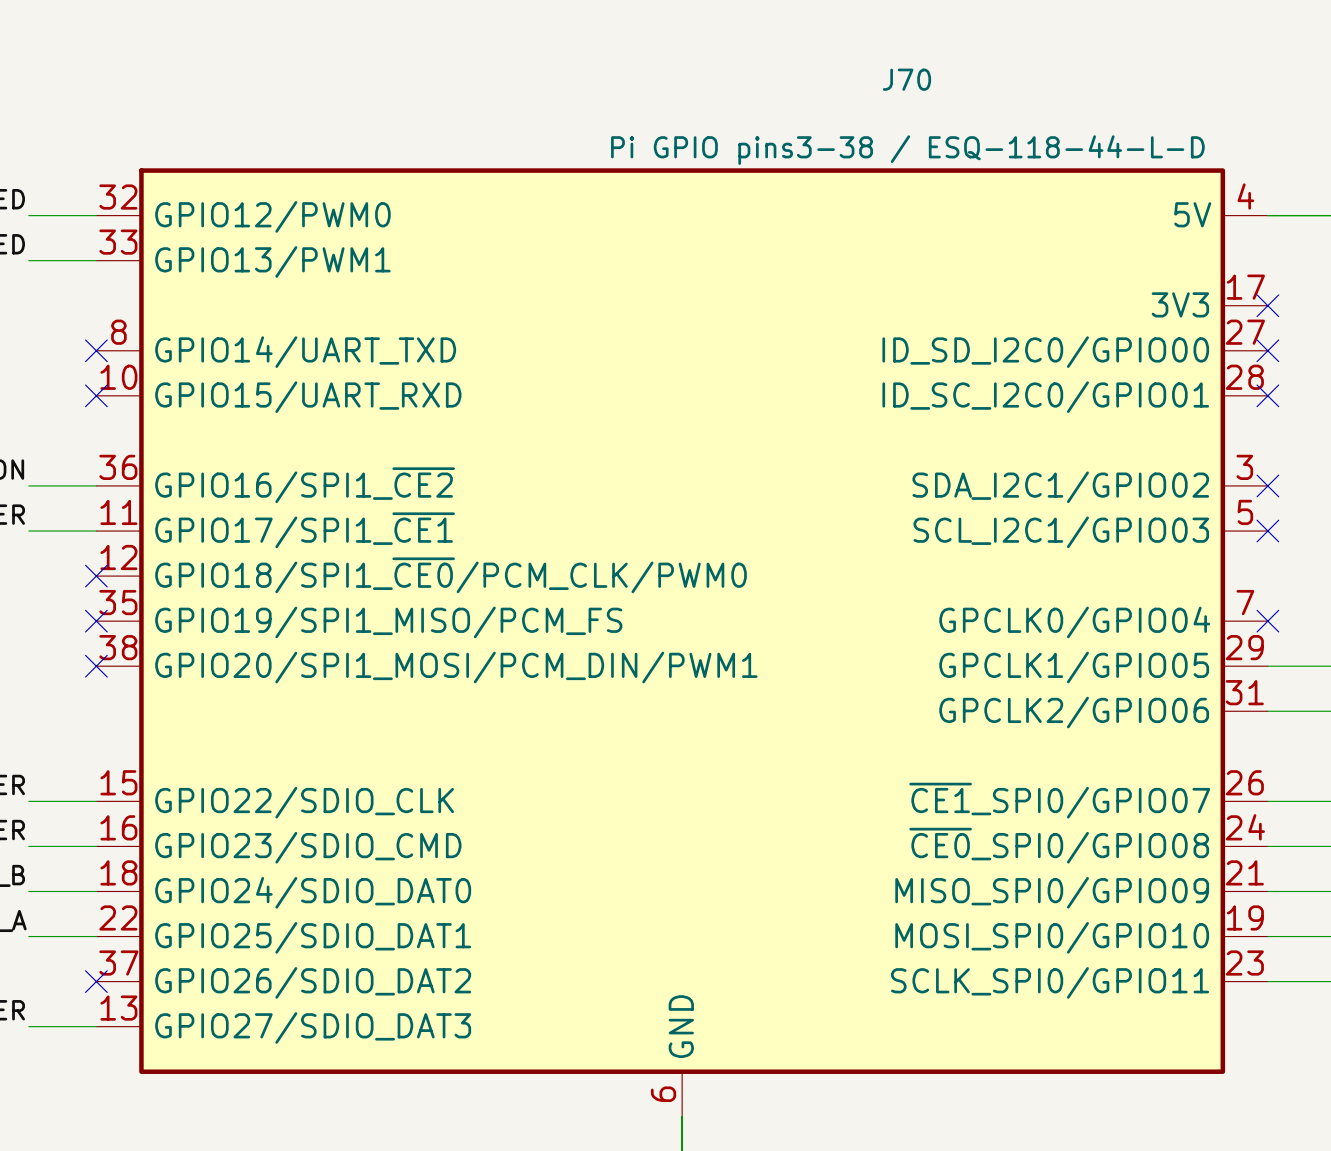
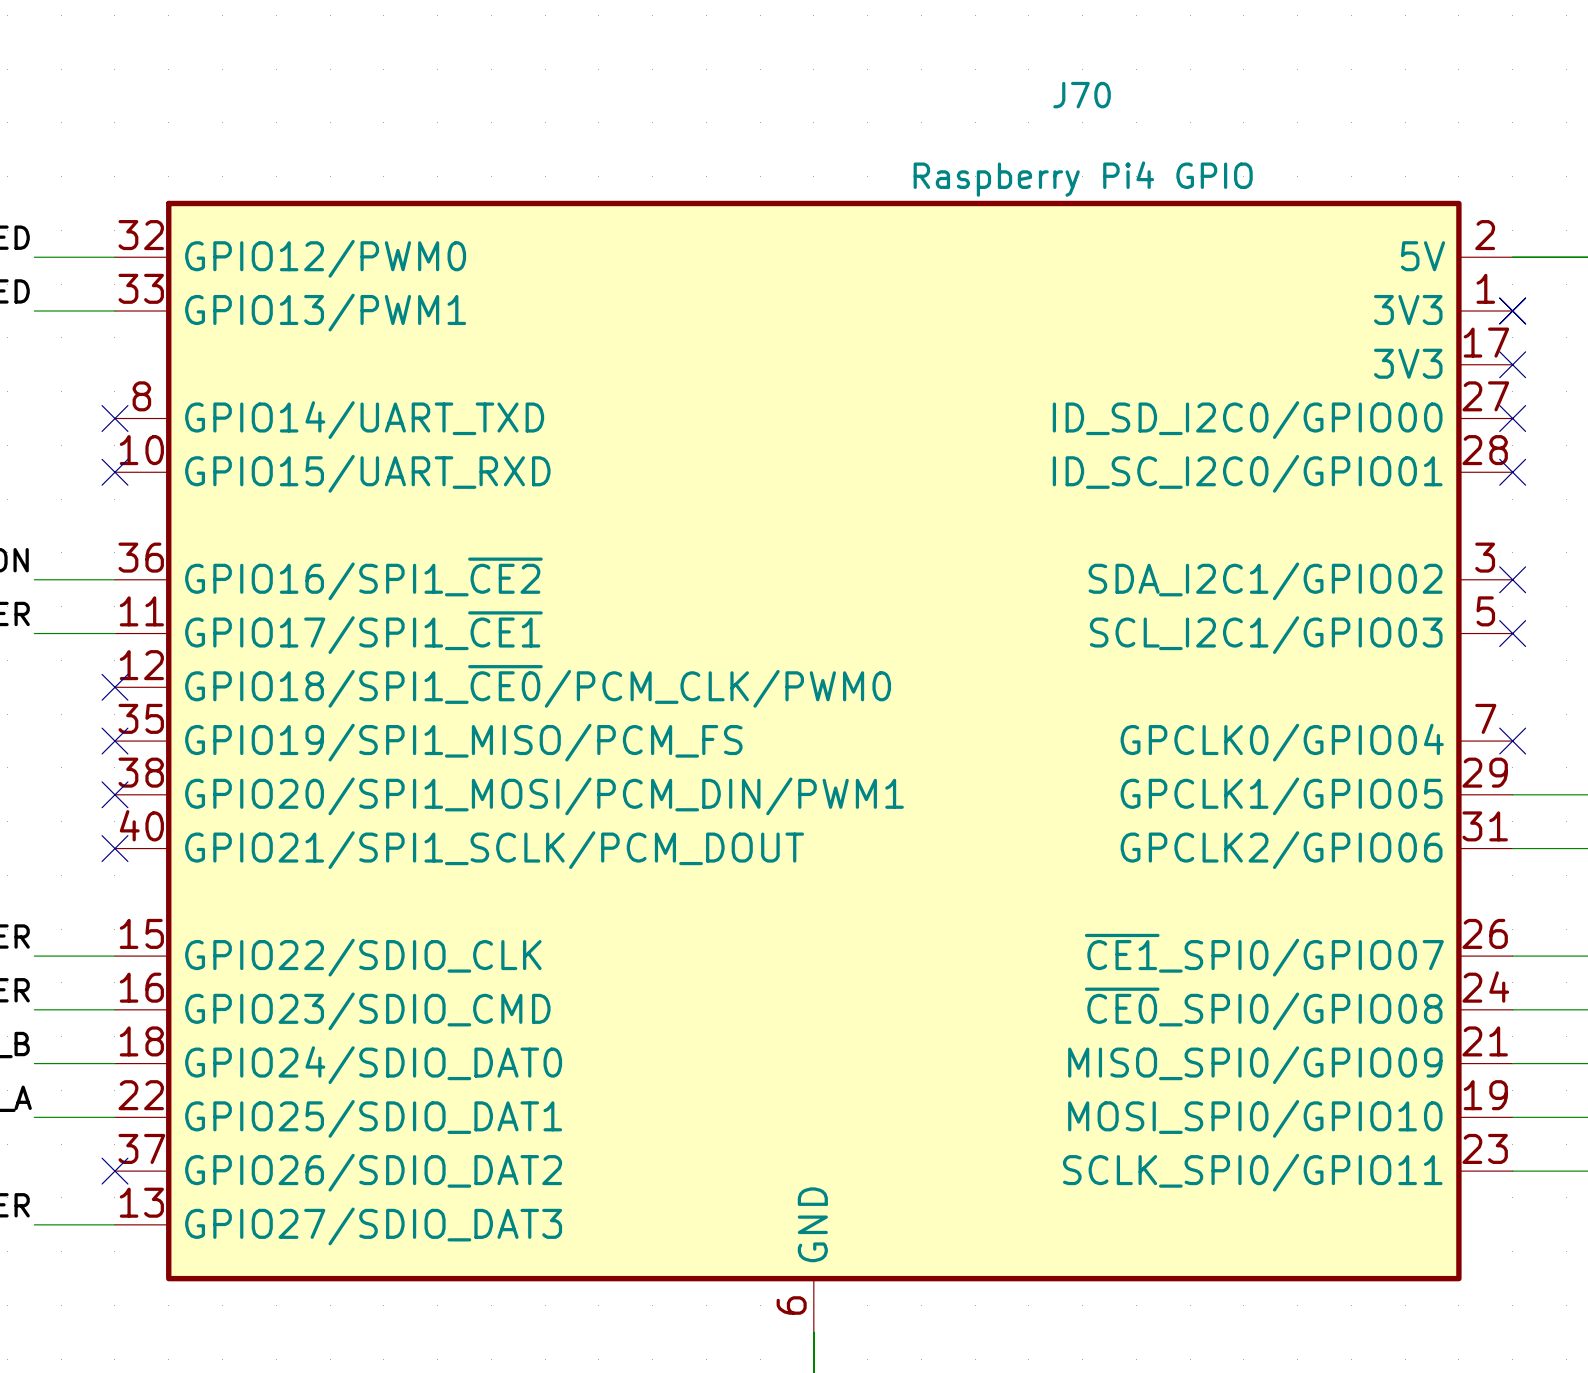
J70 value: Pi GPIO pins3-38 / ESQ-118-44-L-D (907, 150) -> Raspberry Pi4 GPIO (1083, 179)
J70 symbol: [96, 168, 1268, 1117] -> [114, 200, 1513, 1333]
no-connect mark: none -> (1512, 311)
no-connect mark: none -> (114, 848)

